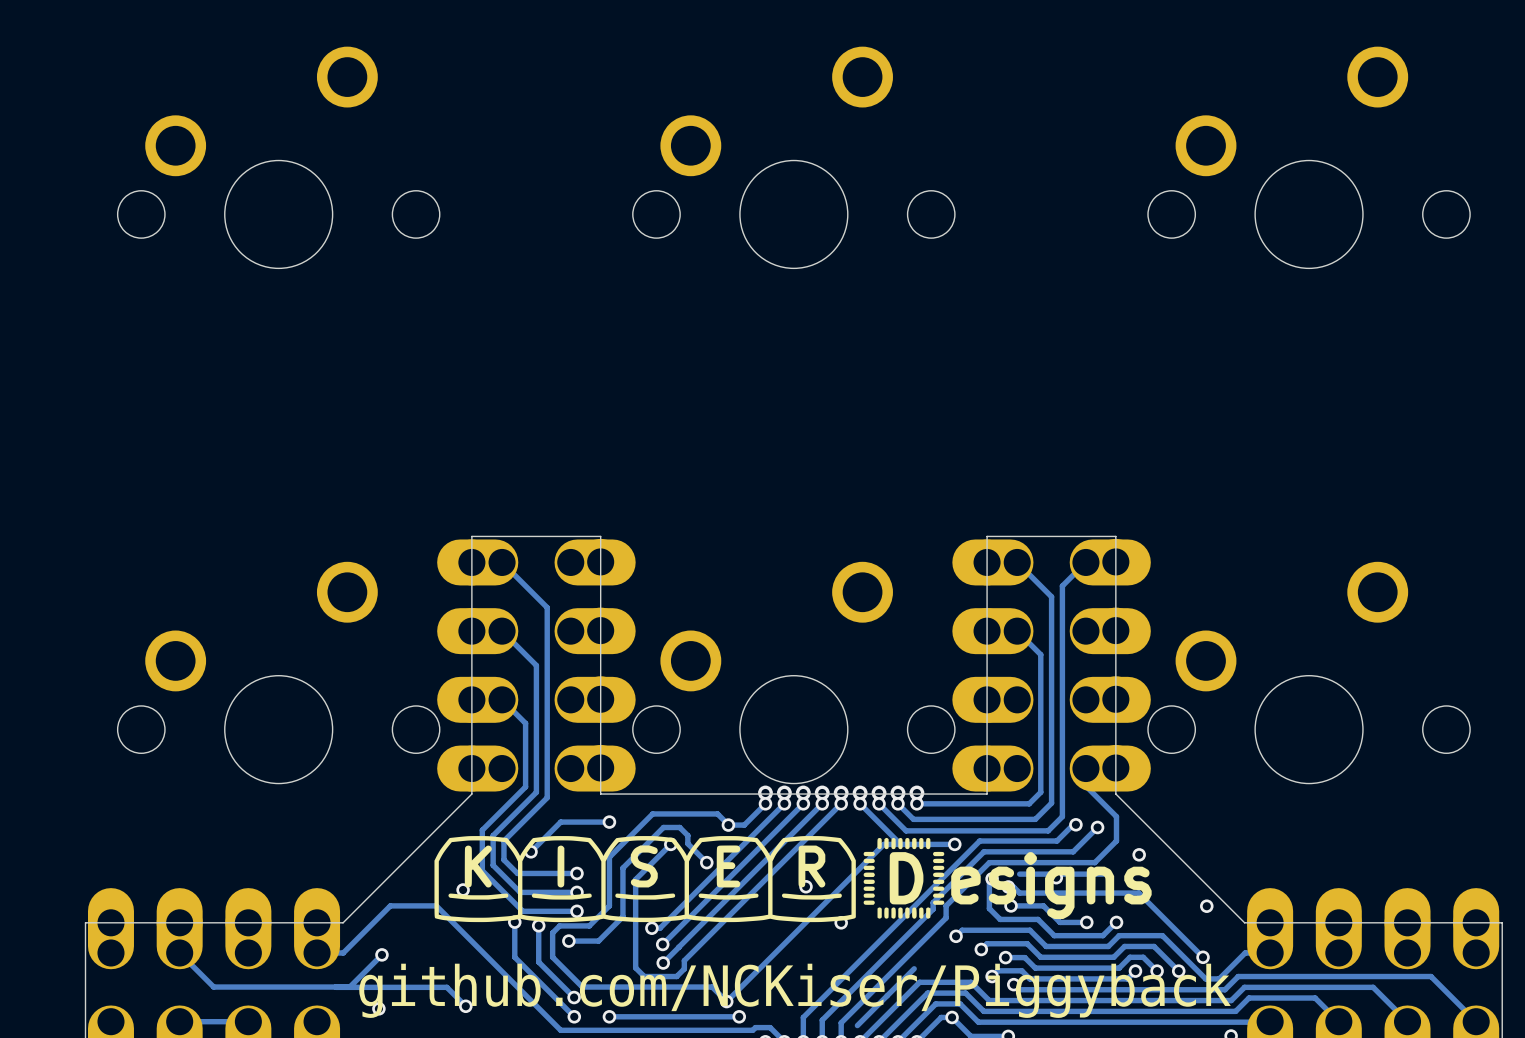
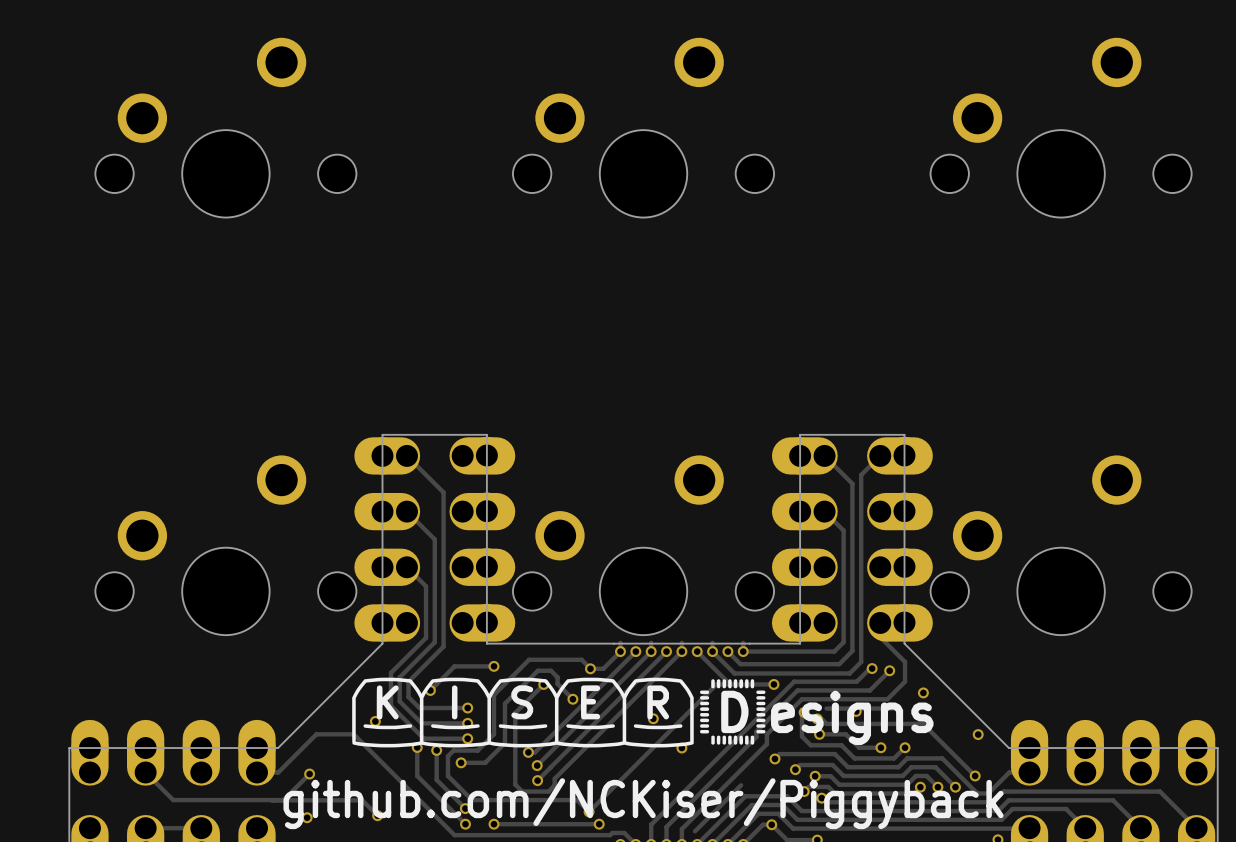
via: (765, 793) -> none
via: (784, 793) -> none
via: (803, 793) -> none
via: (822, 793) -> none
via: (841, 793) -> none
via: (860, 793) -> none
via: (879, 793) -> none
via: (897, 793) -> none
via: (916, 793) -> none

